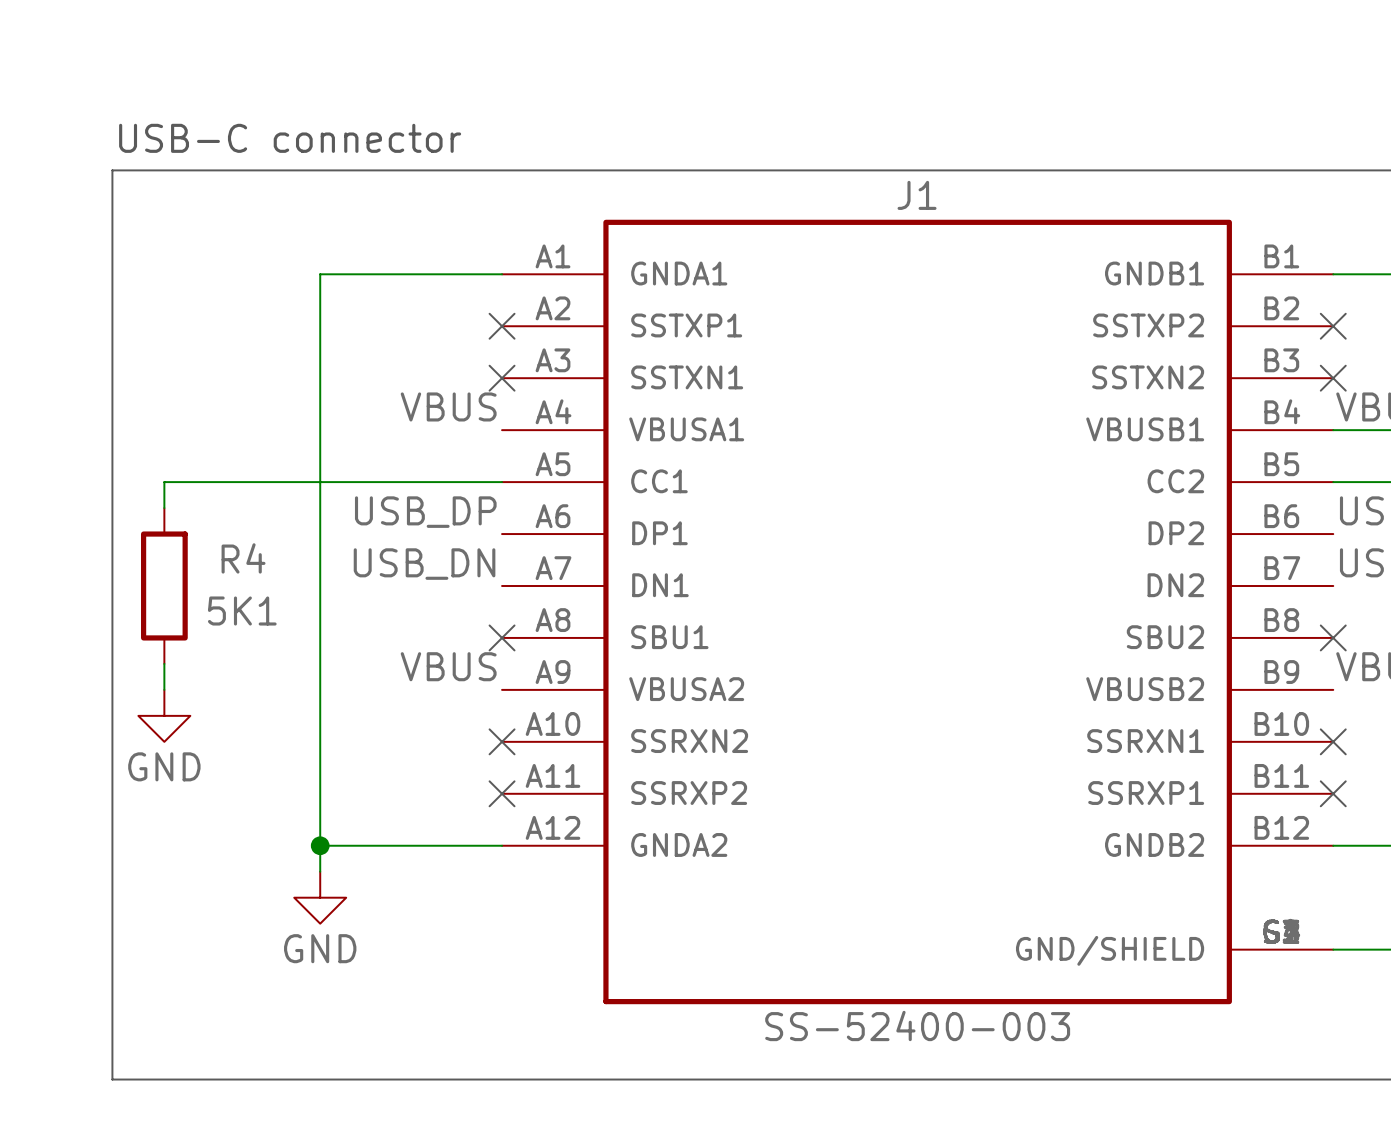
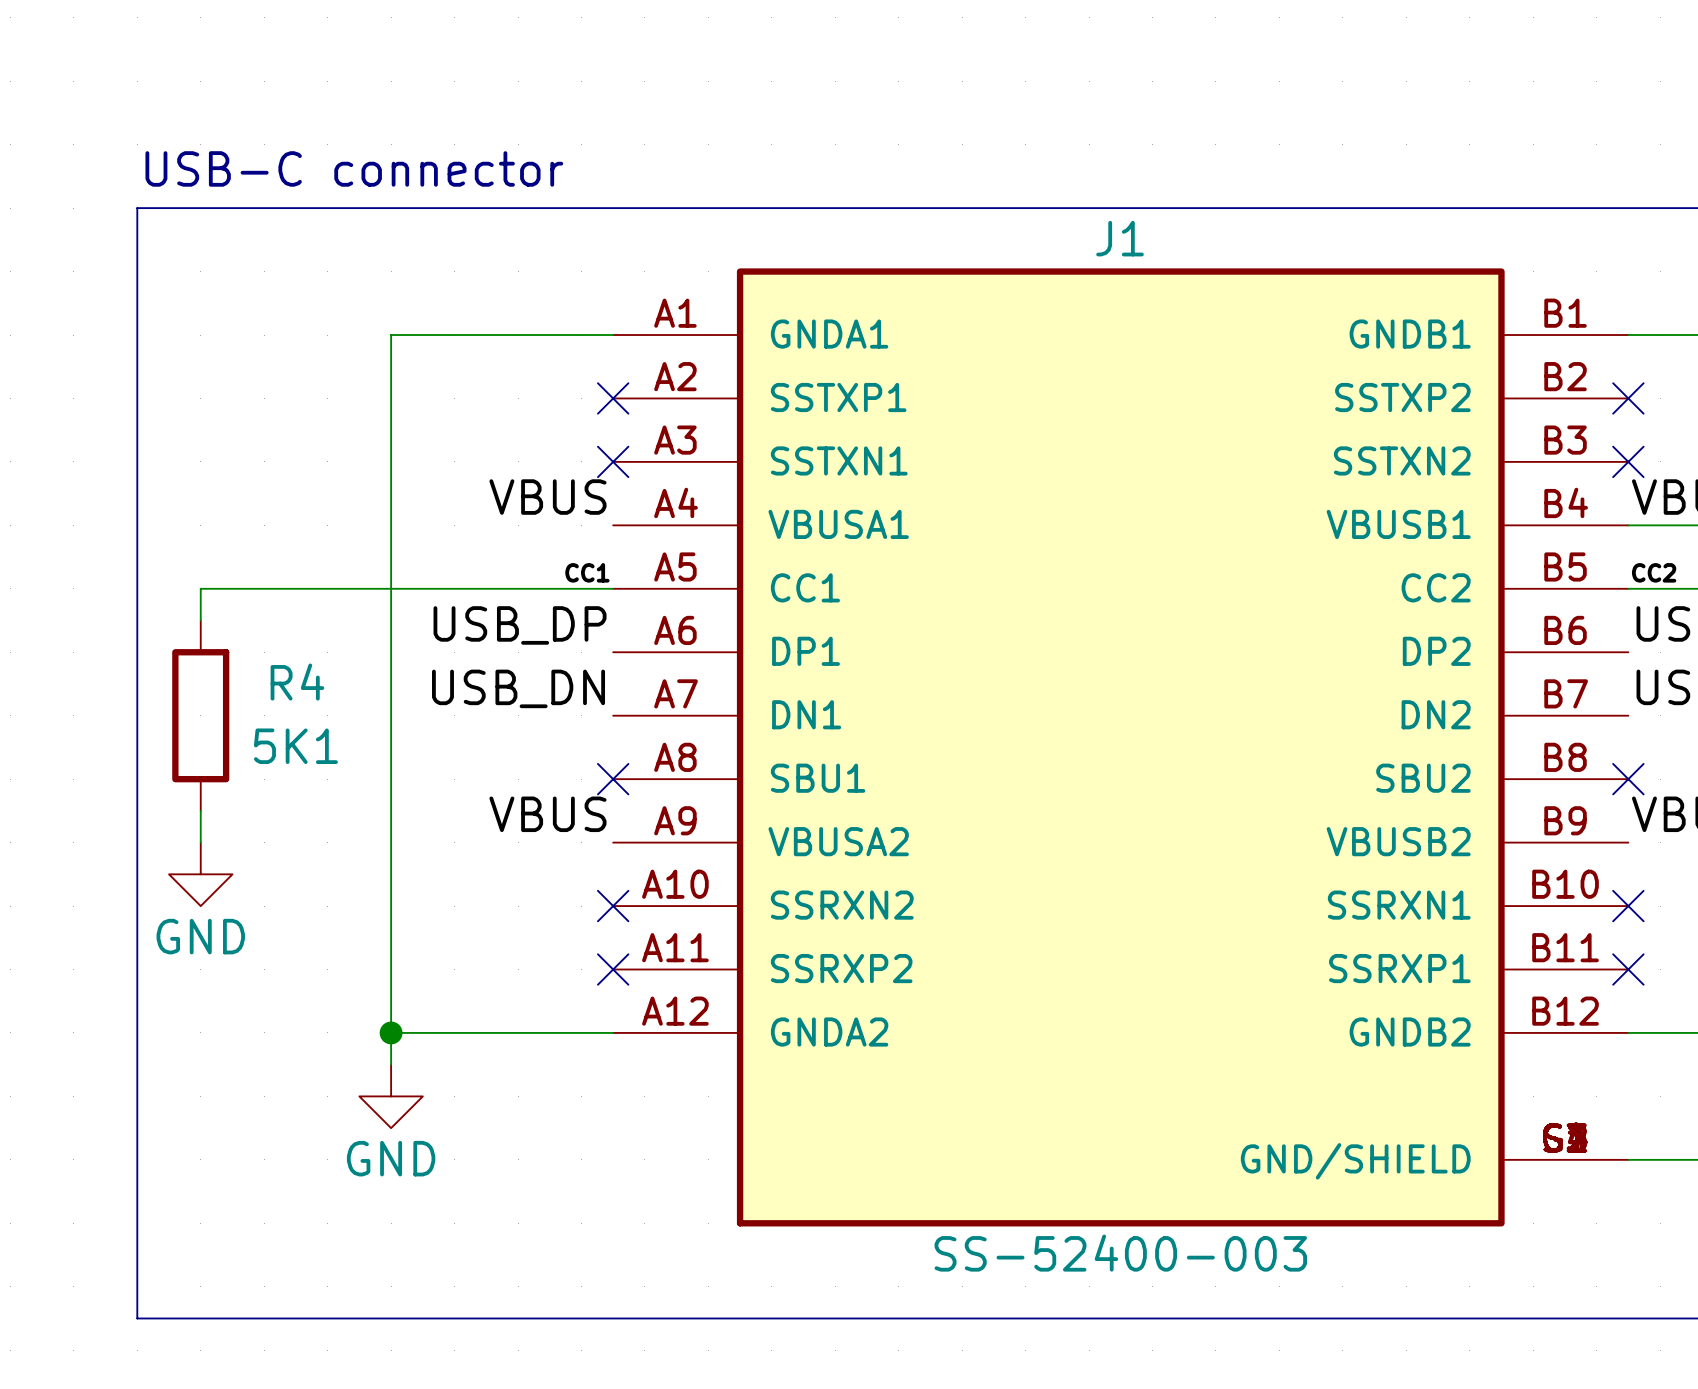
label: none -> CC1 (587, 572)
label: none -> CC2 (1654, 572)

